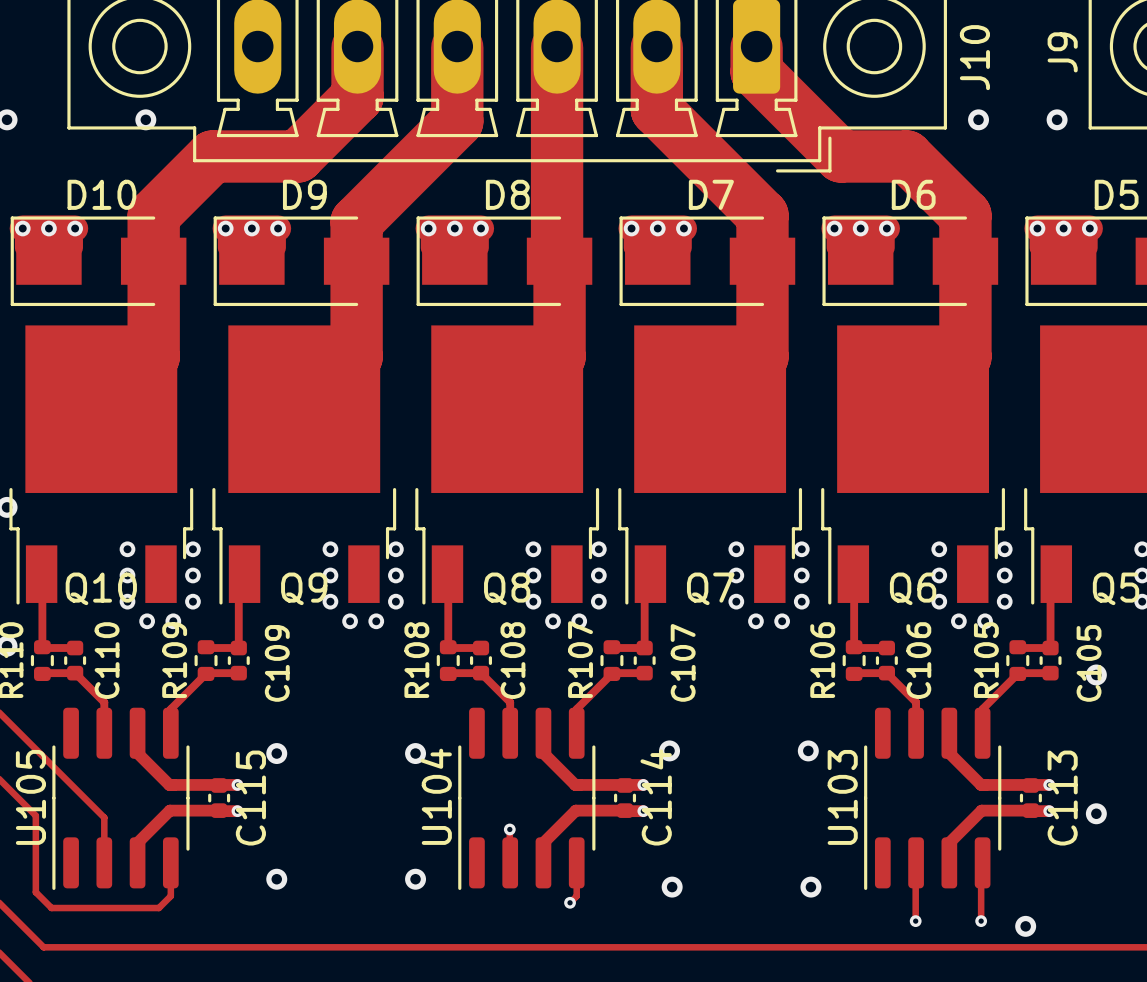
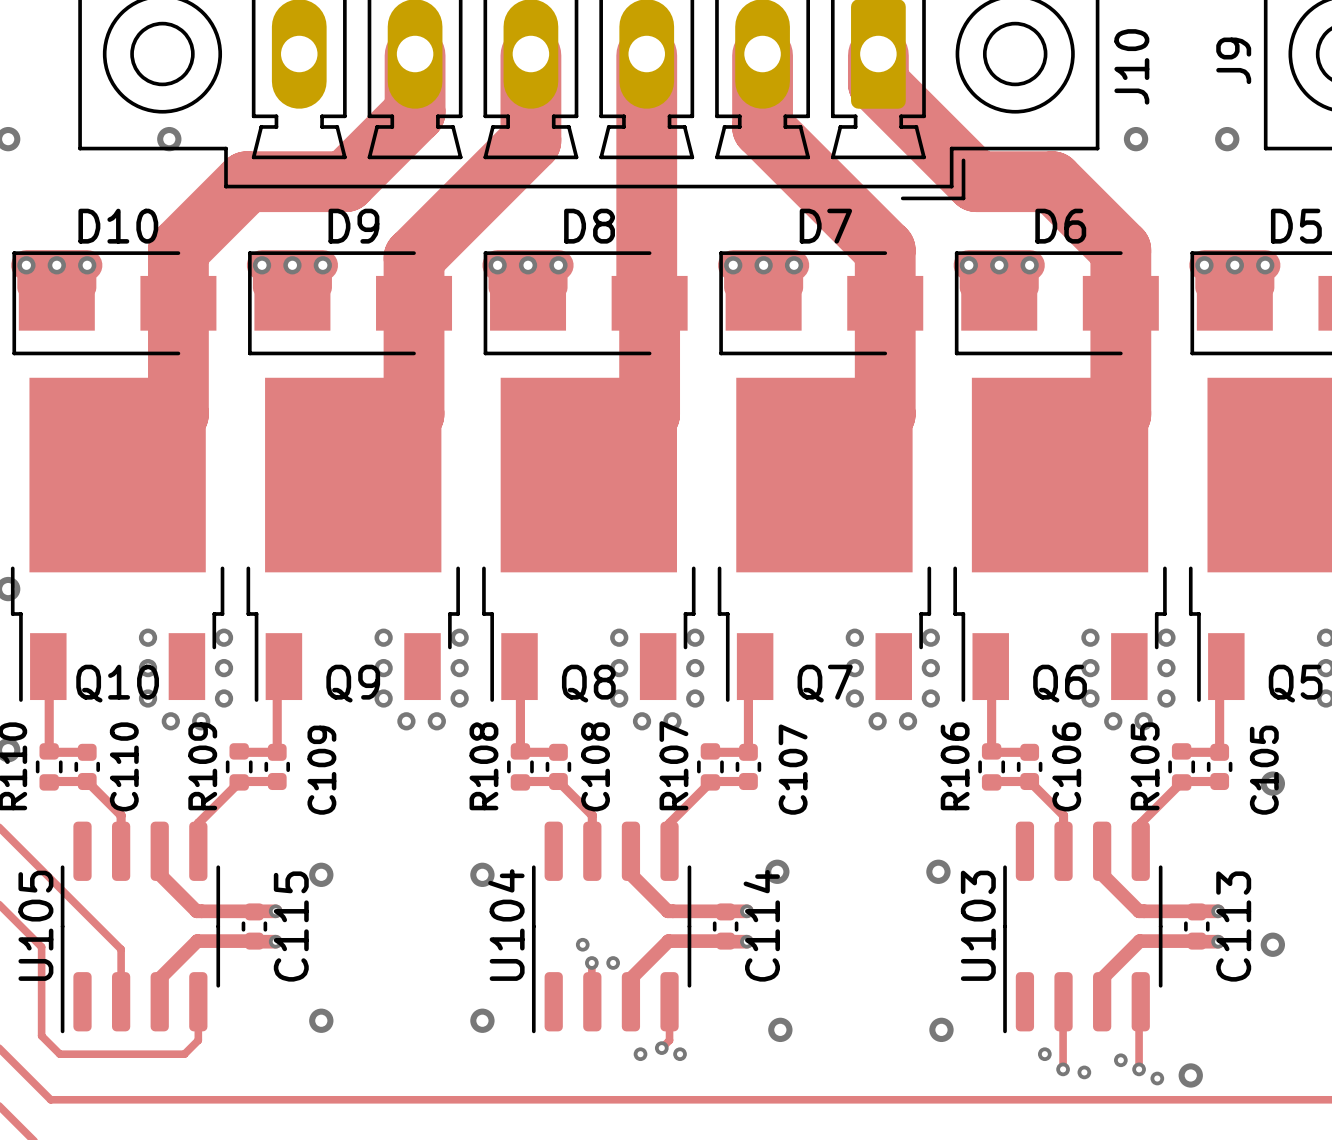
via: none -> (582, 944)
via: none -> (613, 962)
via: none -> (640, 1054)
via: none -> (680, 1054)
via: none -> (1044, 1054)
via: none -> (1120, 1060)
via: none -> (1084, 1072)
via: none -> (1157, 1078)

